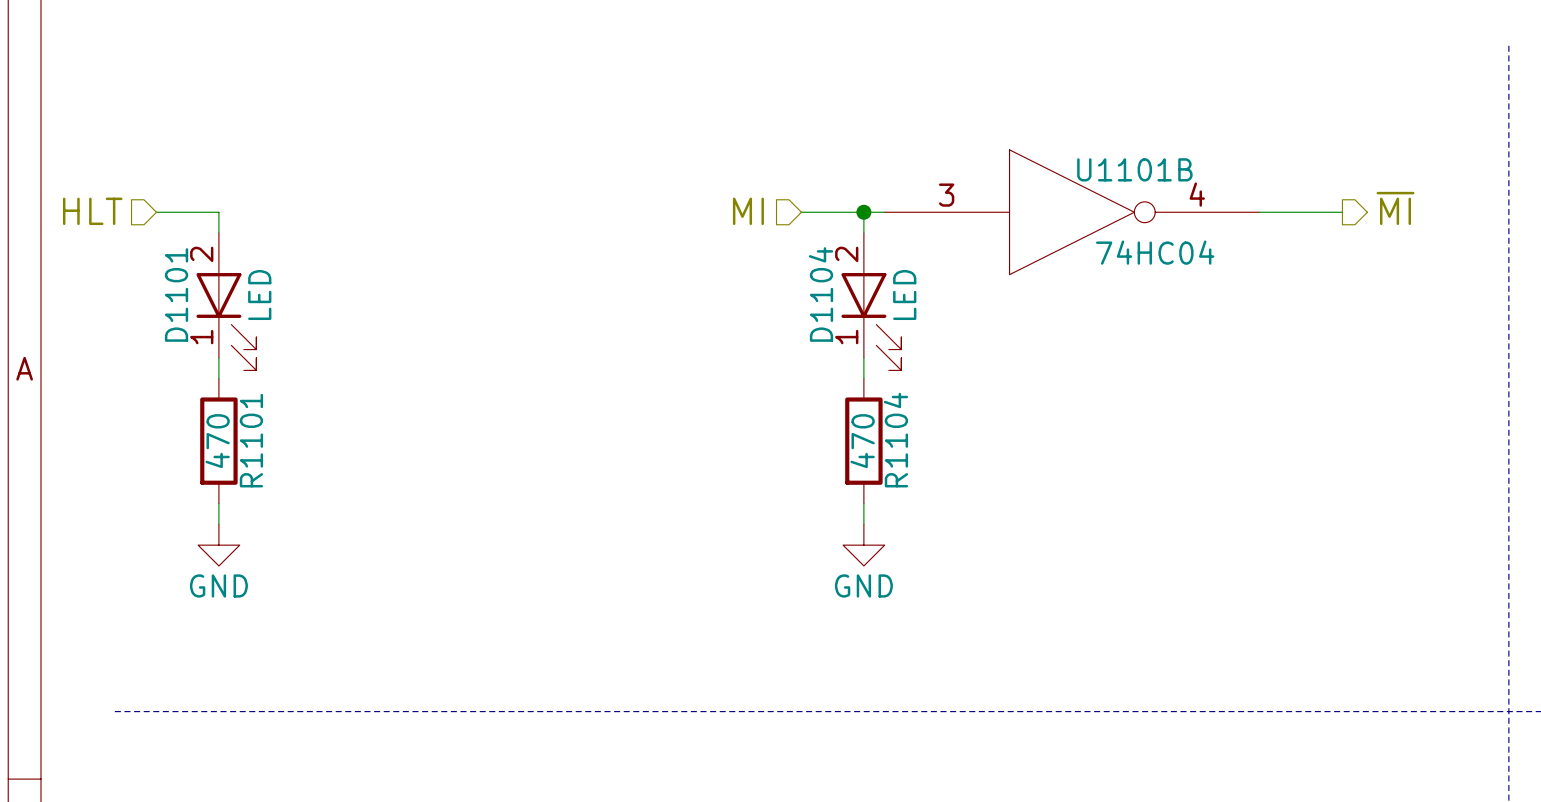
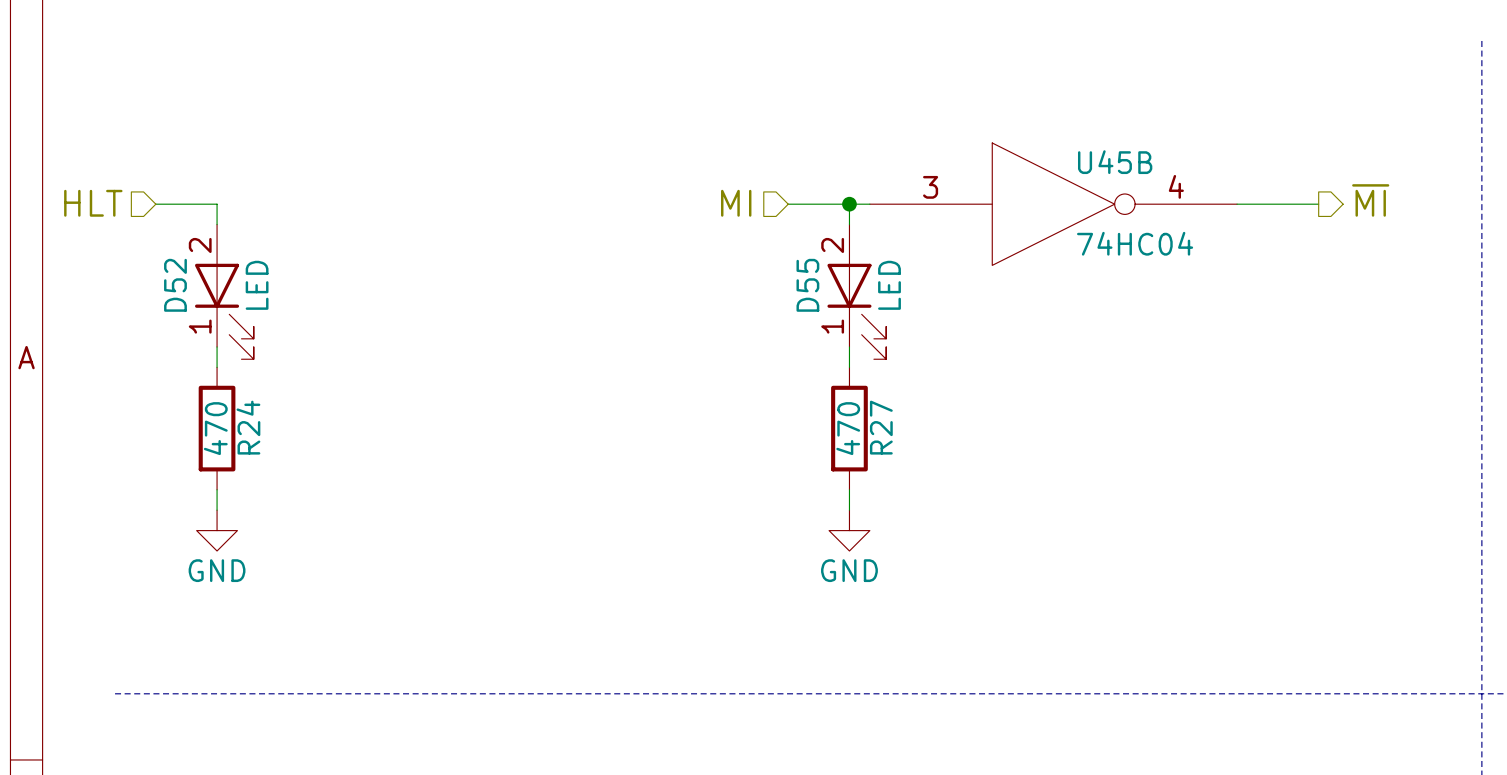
U1101B name: U1101B (1134, 169) -> U45B (1115, 162)
D1101 name: D1101 (176, 294) -> D52 (175, 285)
D1104 name: D1104 (821, 294) -> D55 (807, 285)
R1101 name: R1101 (251, 440) -> R24 (248, 427)
R1104 name: R1104 (895, 440) -> R27 (881, 427)

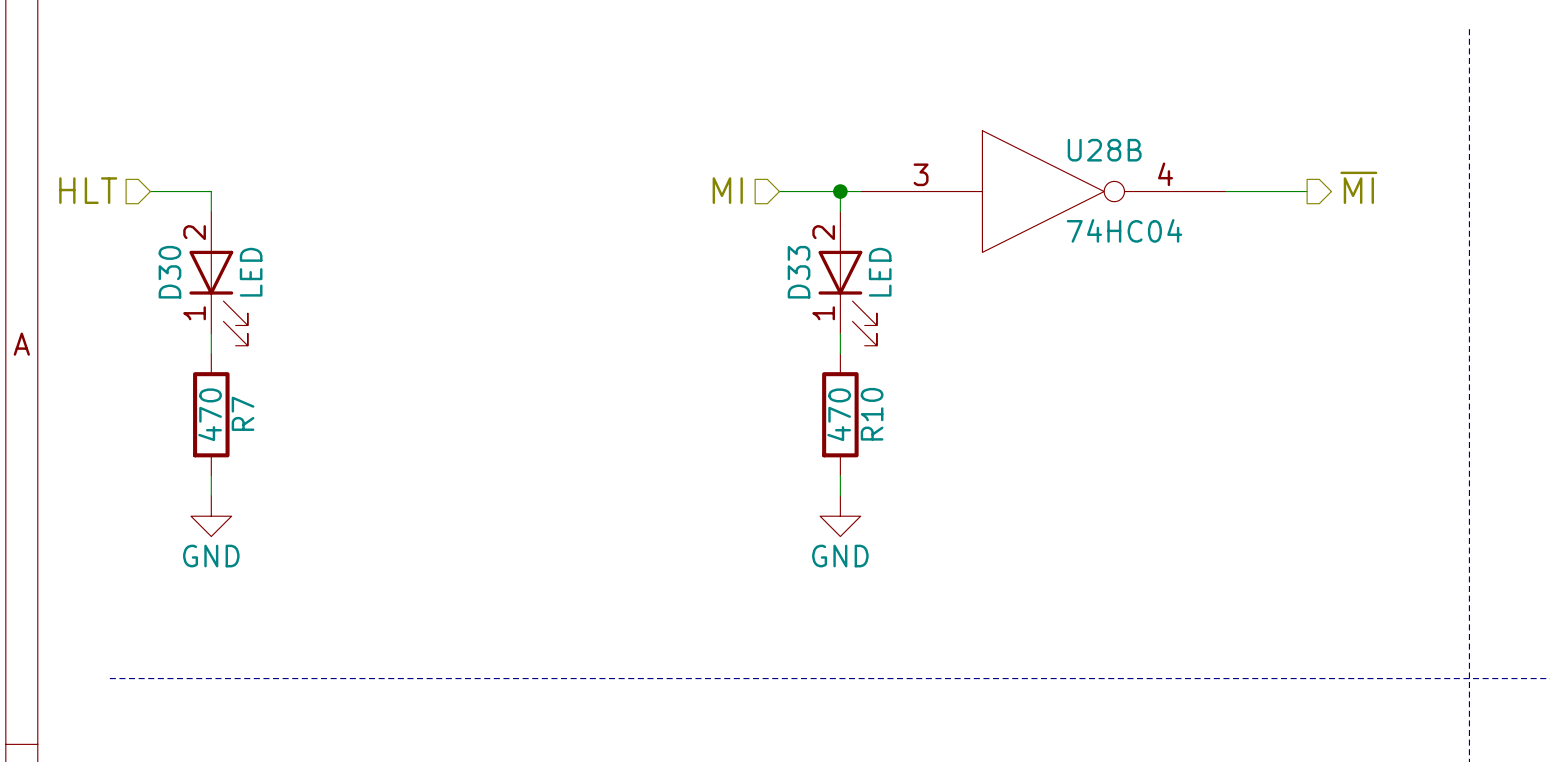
U45B name: U45B (1115, 162) -> U28B (1104, 150)
D52 name: D52 (175, 285) -> D30 (169, 272)
D55 name: D55 (807, 285) -> D33 (799, 272)
R24 name: R24 (248, 427) -> R7 (243, 413)
R27 name: R27 (881, 427) -> R10 (872, 414)

